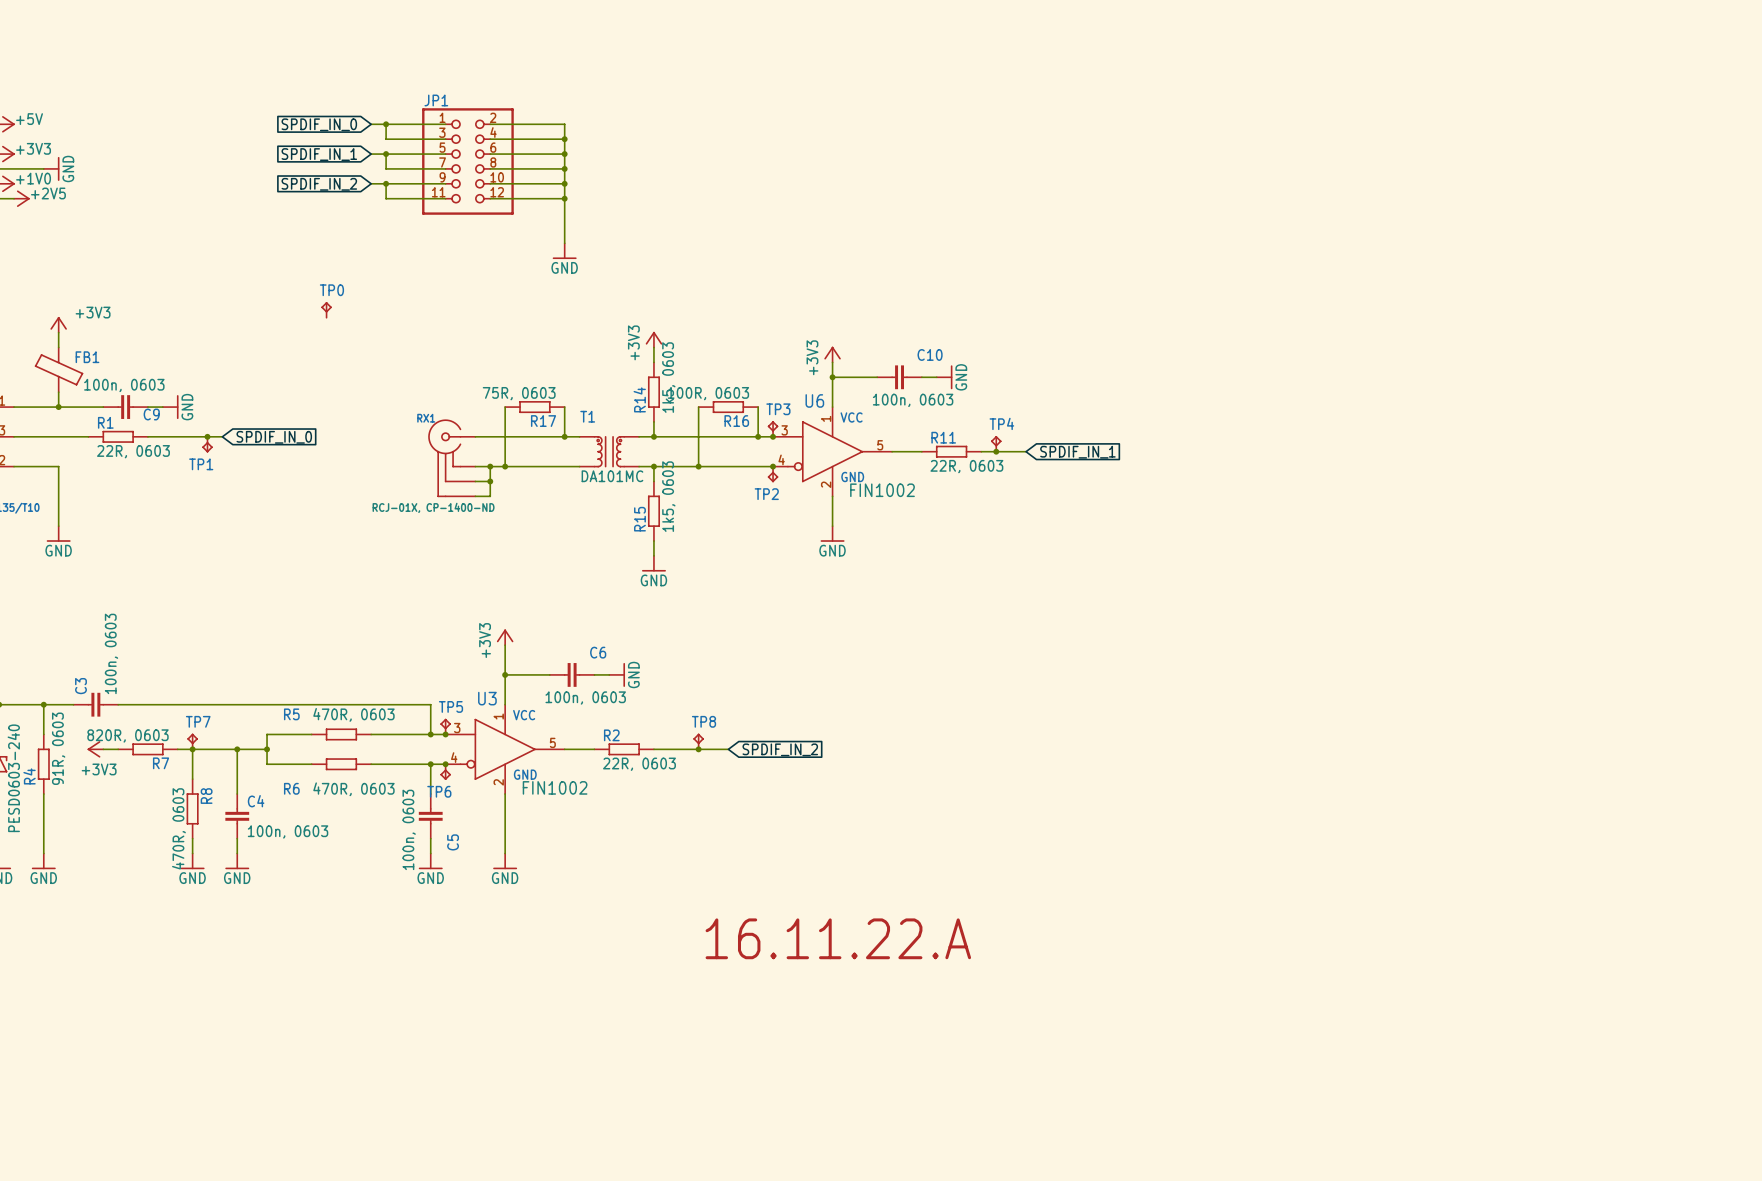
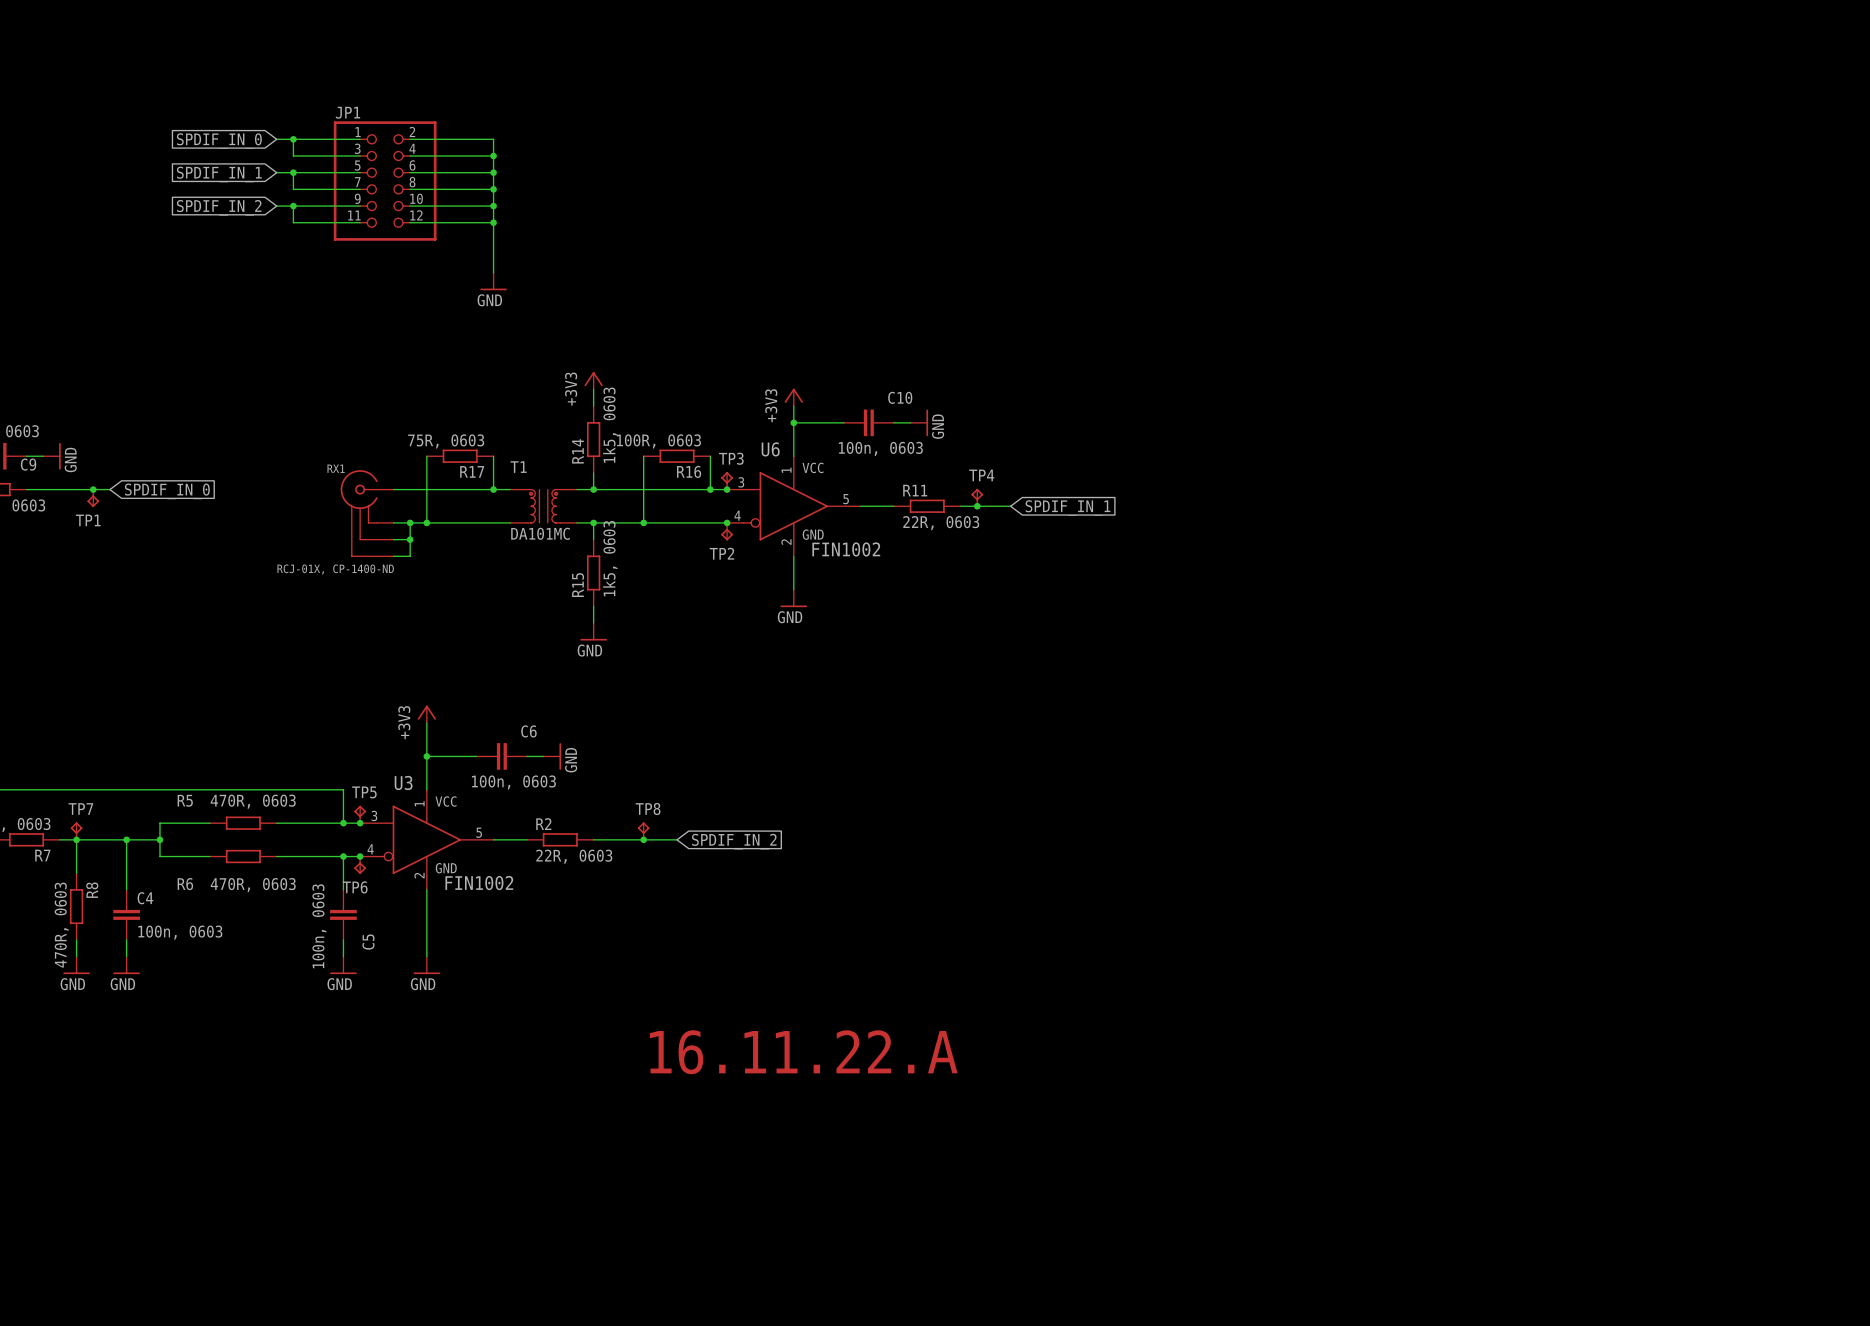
TP0: (326, 309) -> none

